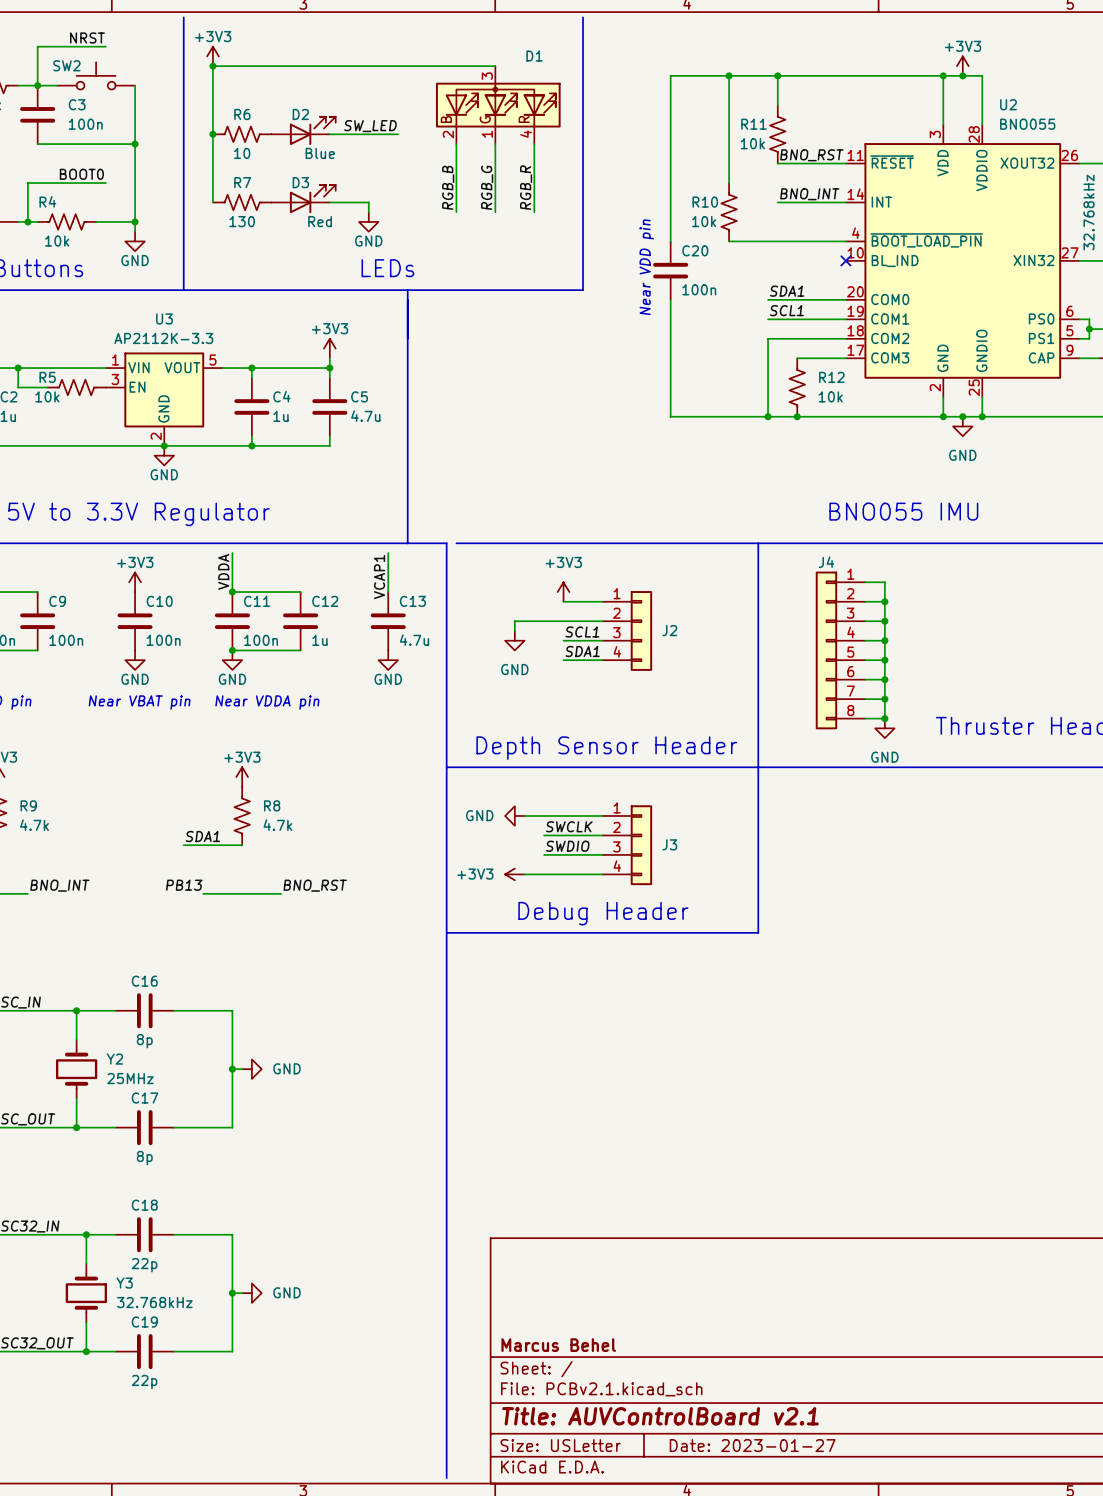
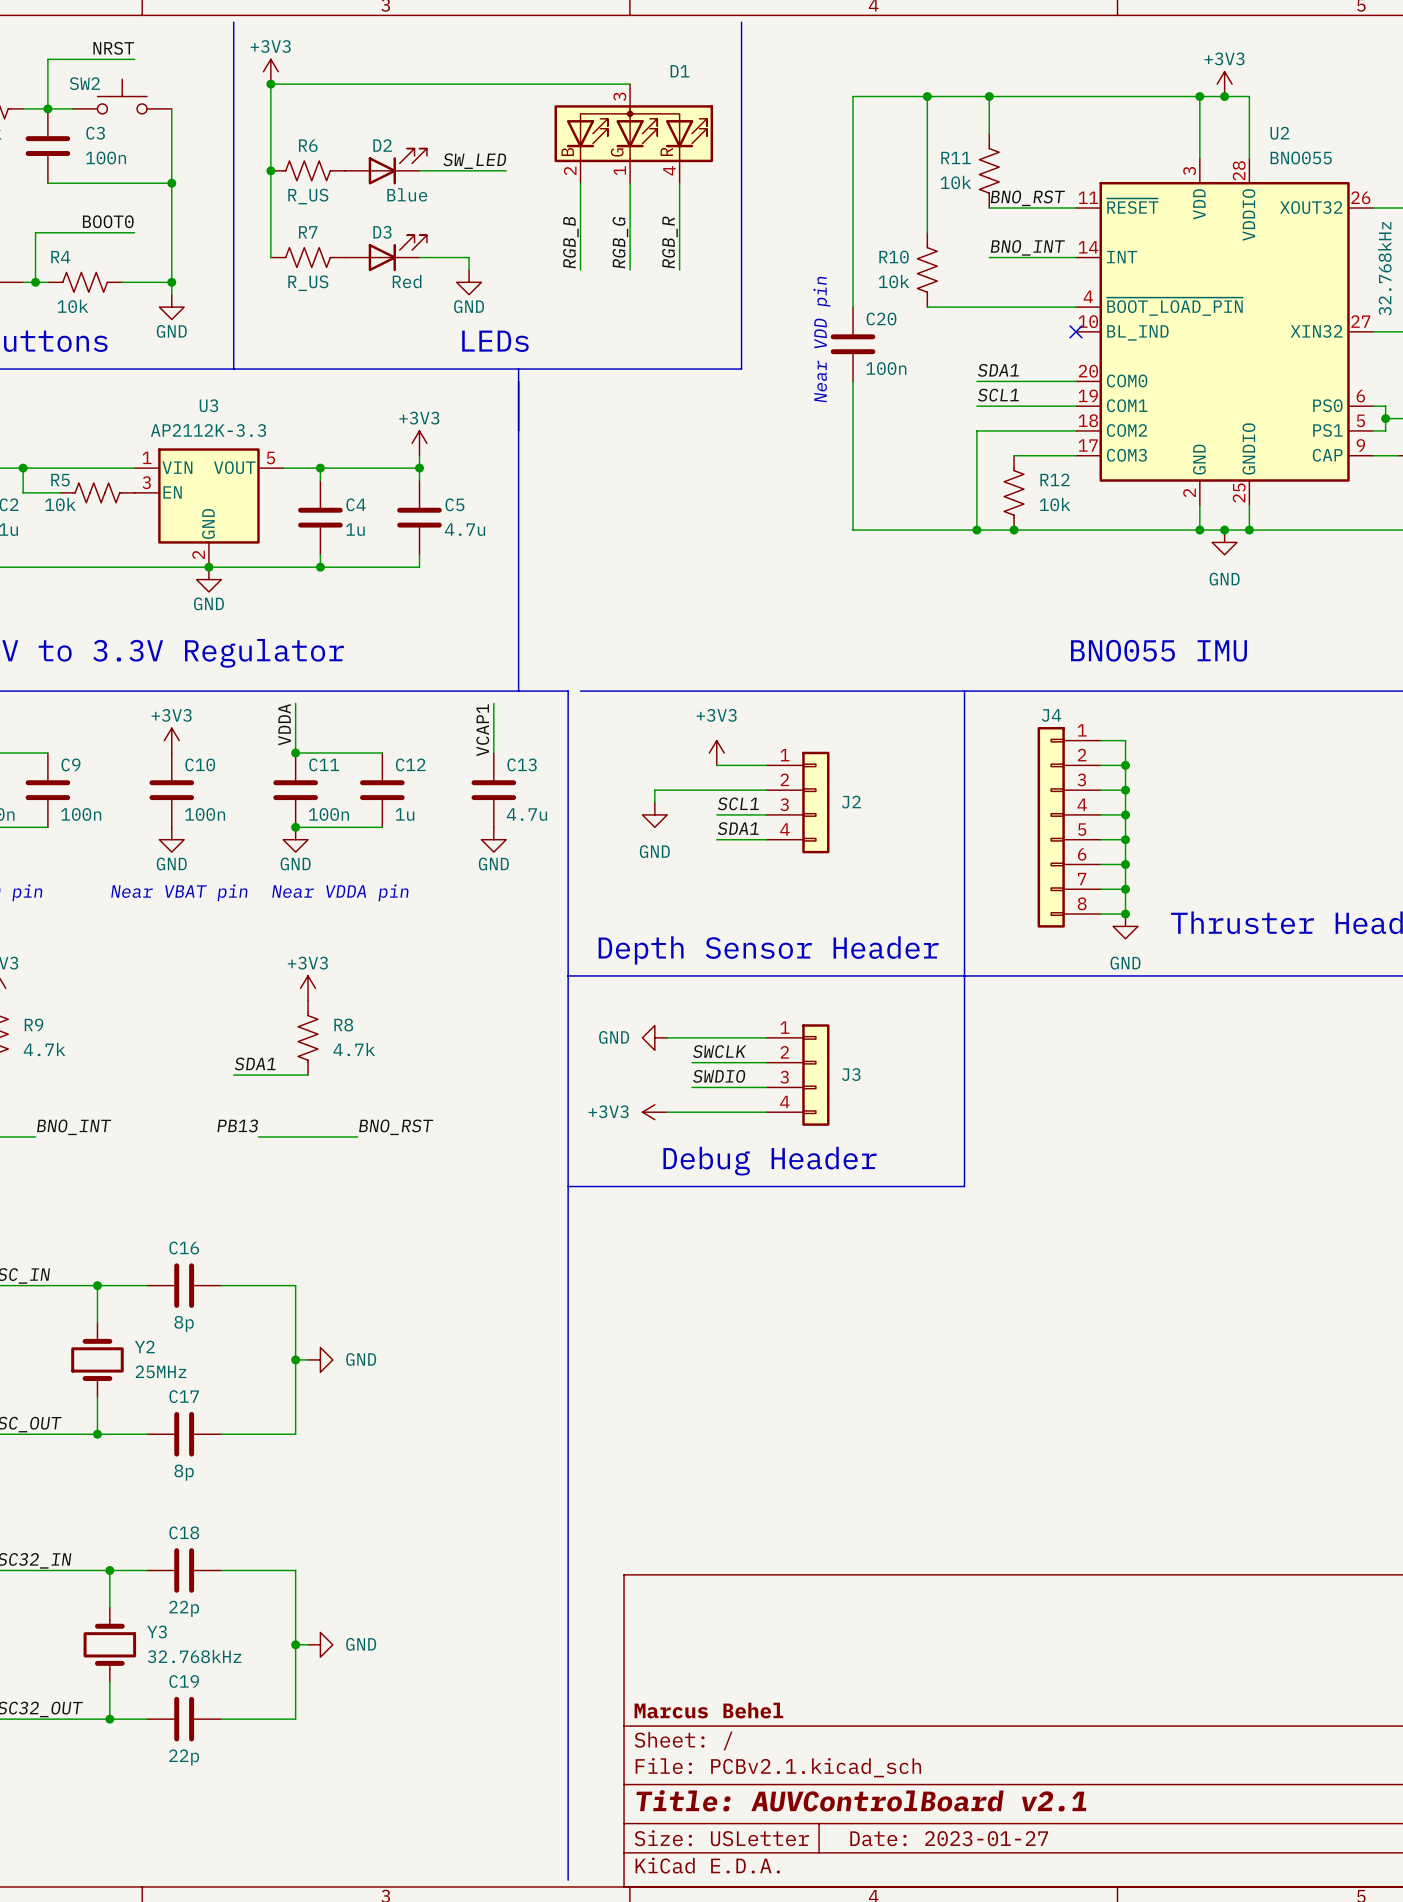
R6 value: 10 (242, 153) -> R_US (308, 196)
R7 value: 130 (242, 221) -> R_US (308, 283)

